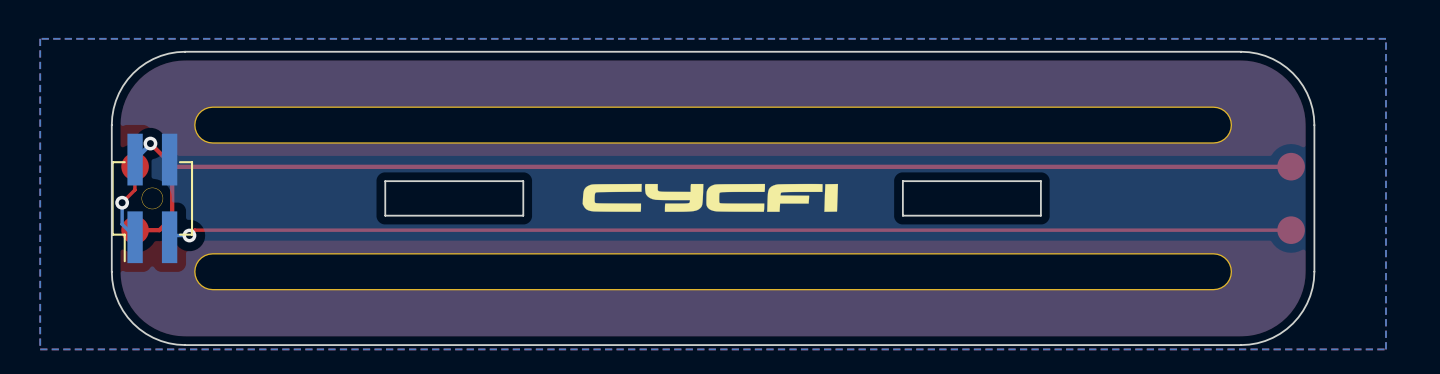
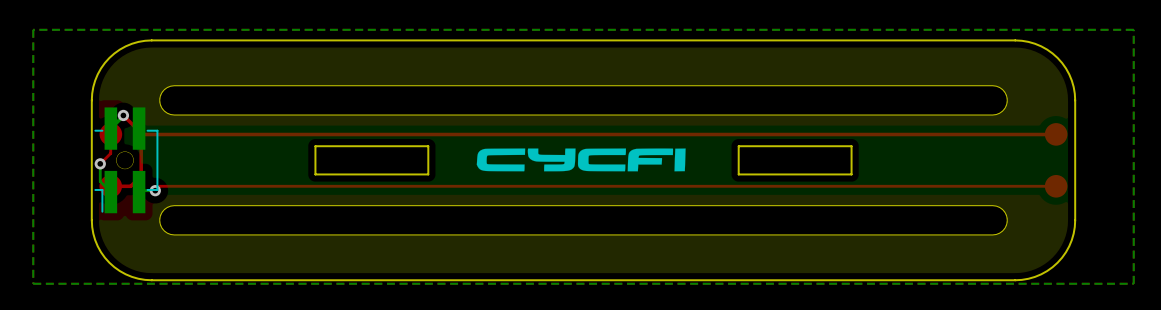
part footprint: [111, 133, 194, 264] -> [94, 107, 159, 214]

